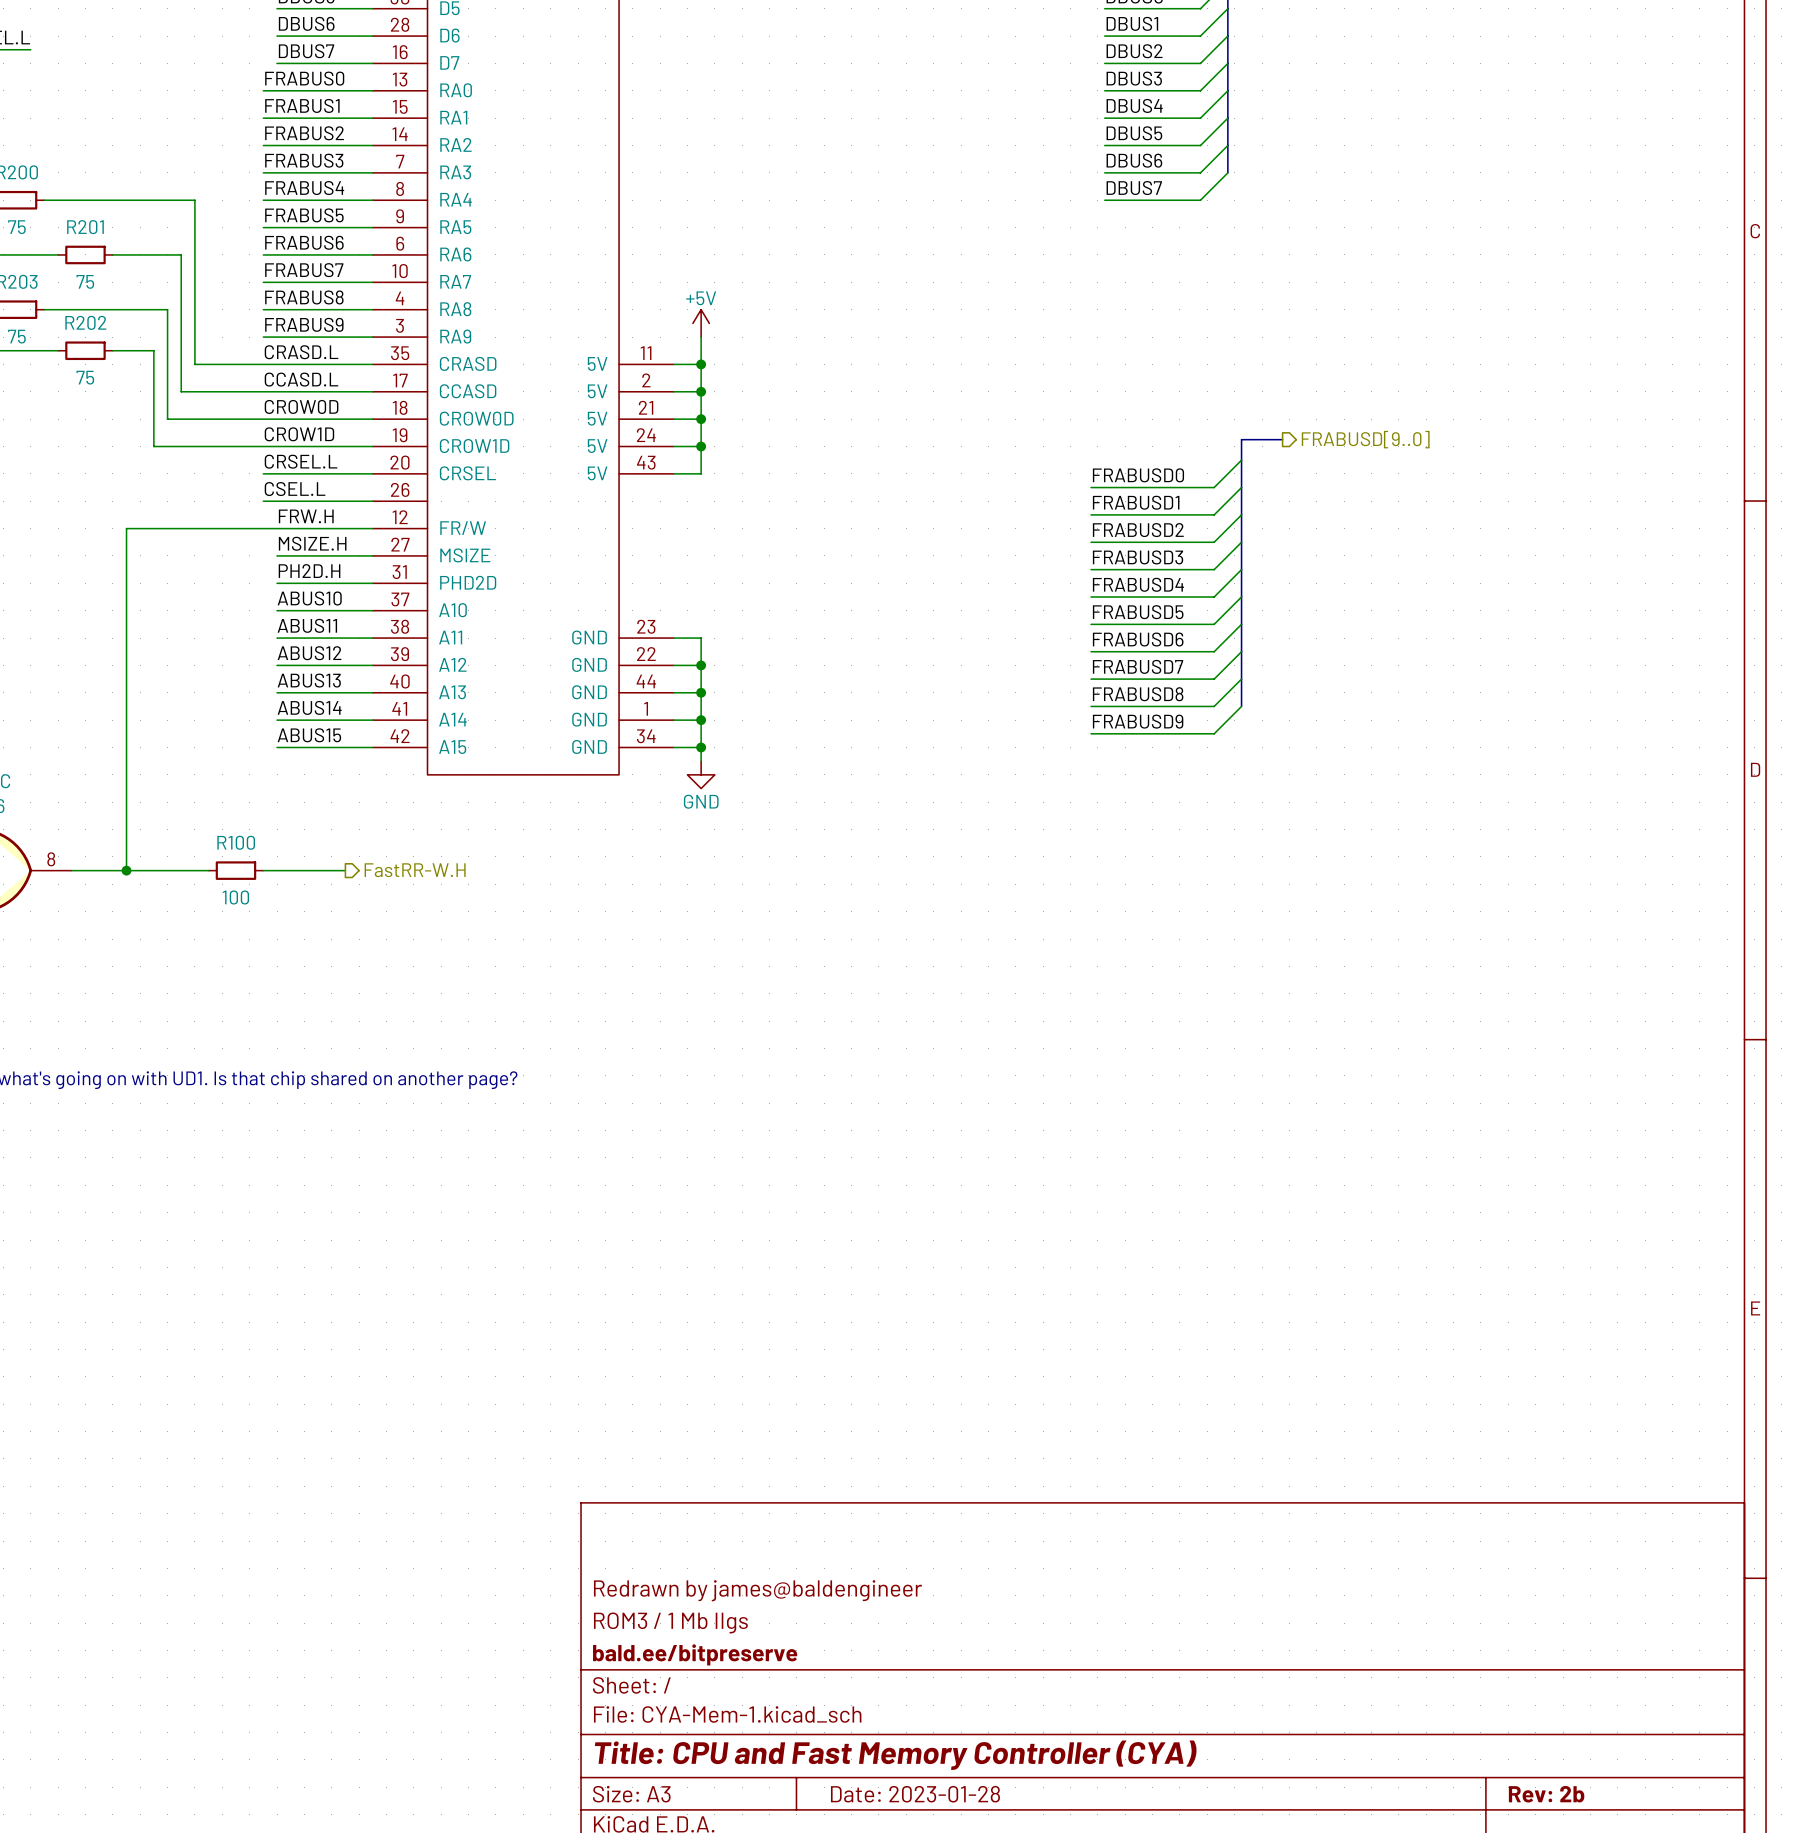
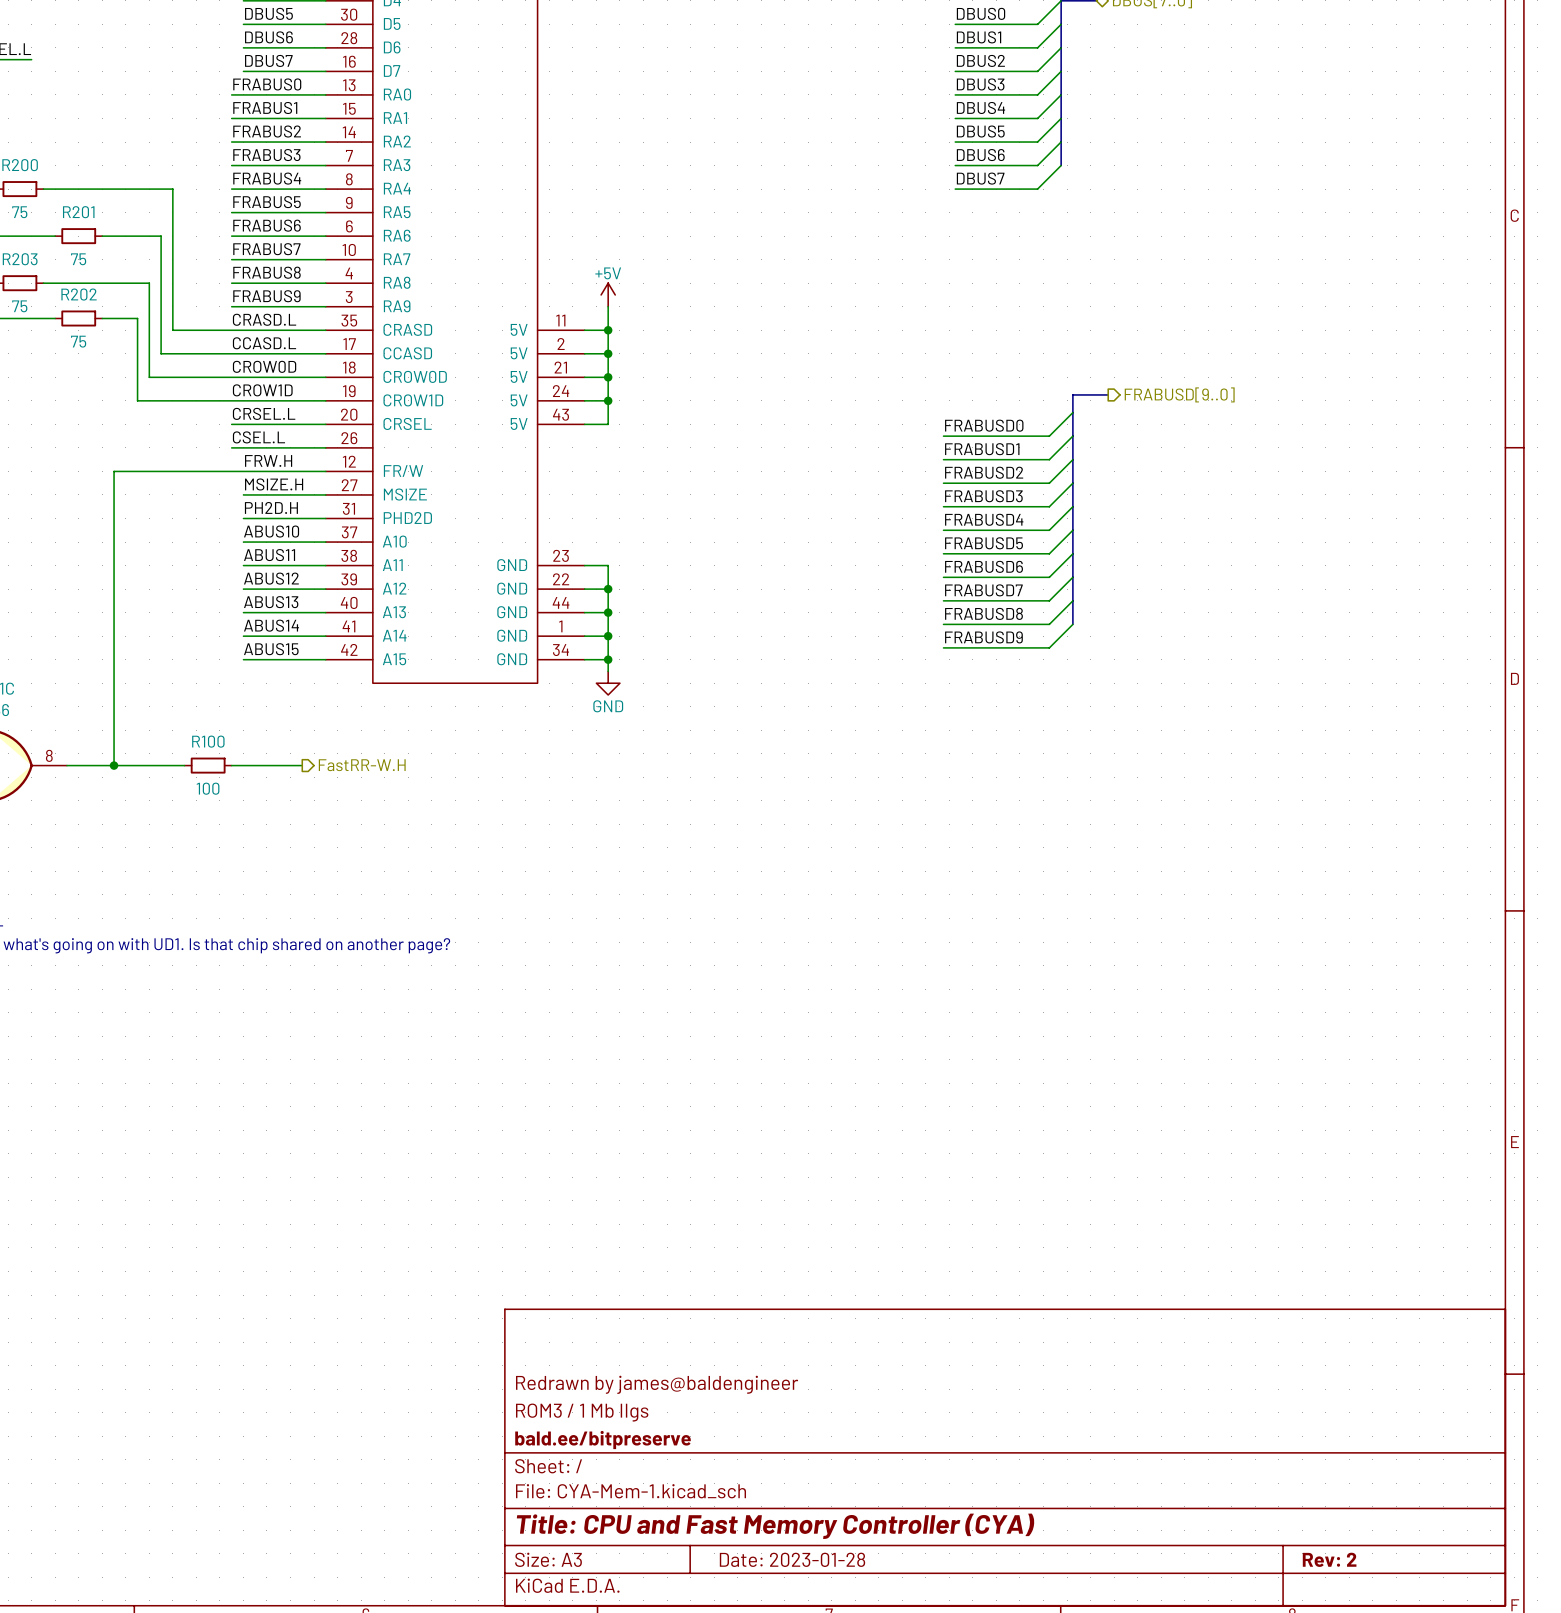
title block: Rev: 2b (1546, 1794) -> Rev: 2 (1329, 1559)

